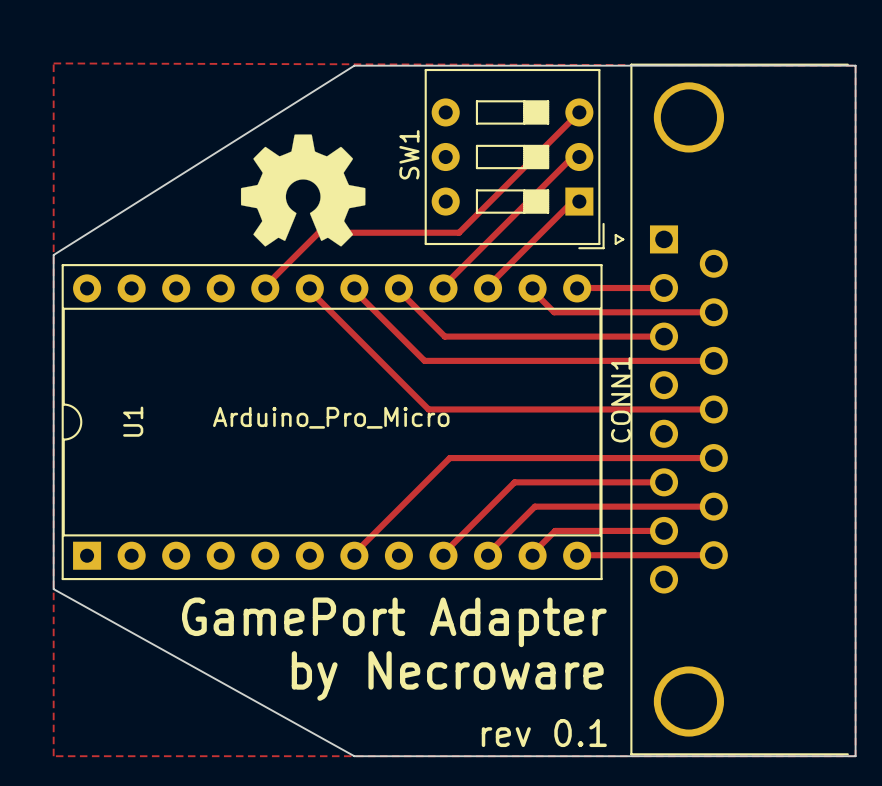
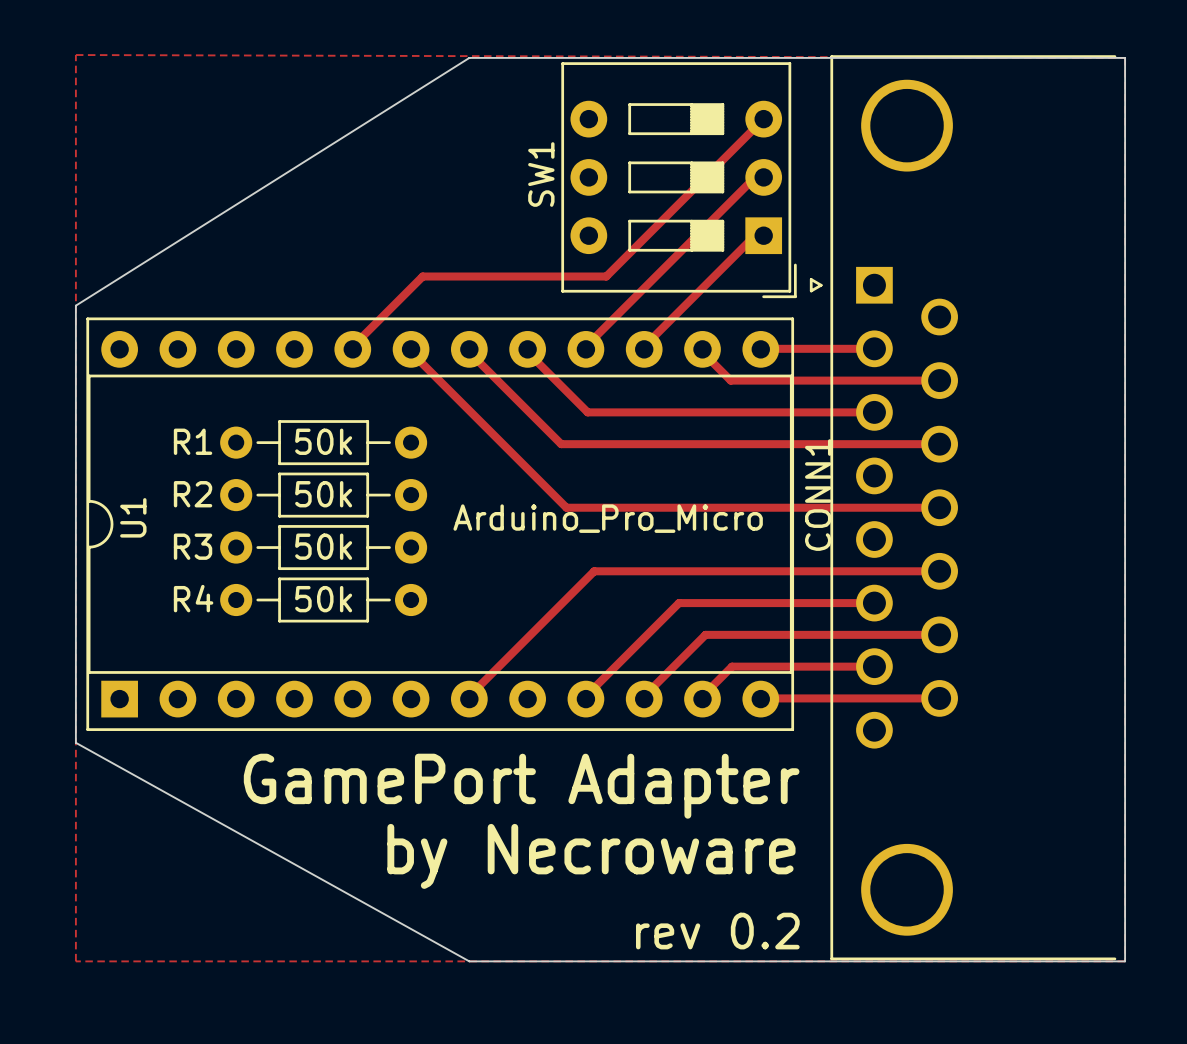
drawing: [240, 134, 366, 247] -> none
R1: none -> 50k (323, 442)
R2: none -> 50k (323, 495)
U1 value position: Arduino_Pro_Micro (331, 417) -> Arduino_Pro_Micro (608, 518)
U1 name position: U1 (133, 421) -> U1 (133, 517)
R3: none -> 50k (323, 547)
R4: none -> 50k (323, 600)
text: rev 0.1 (544, 733) -> rev 0.2 (717, 931)

